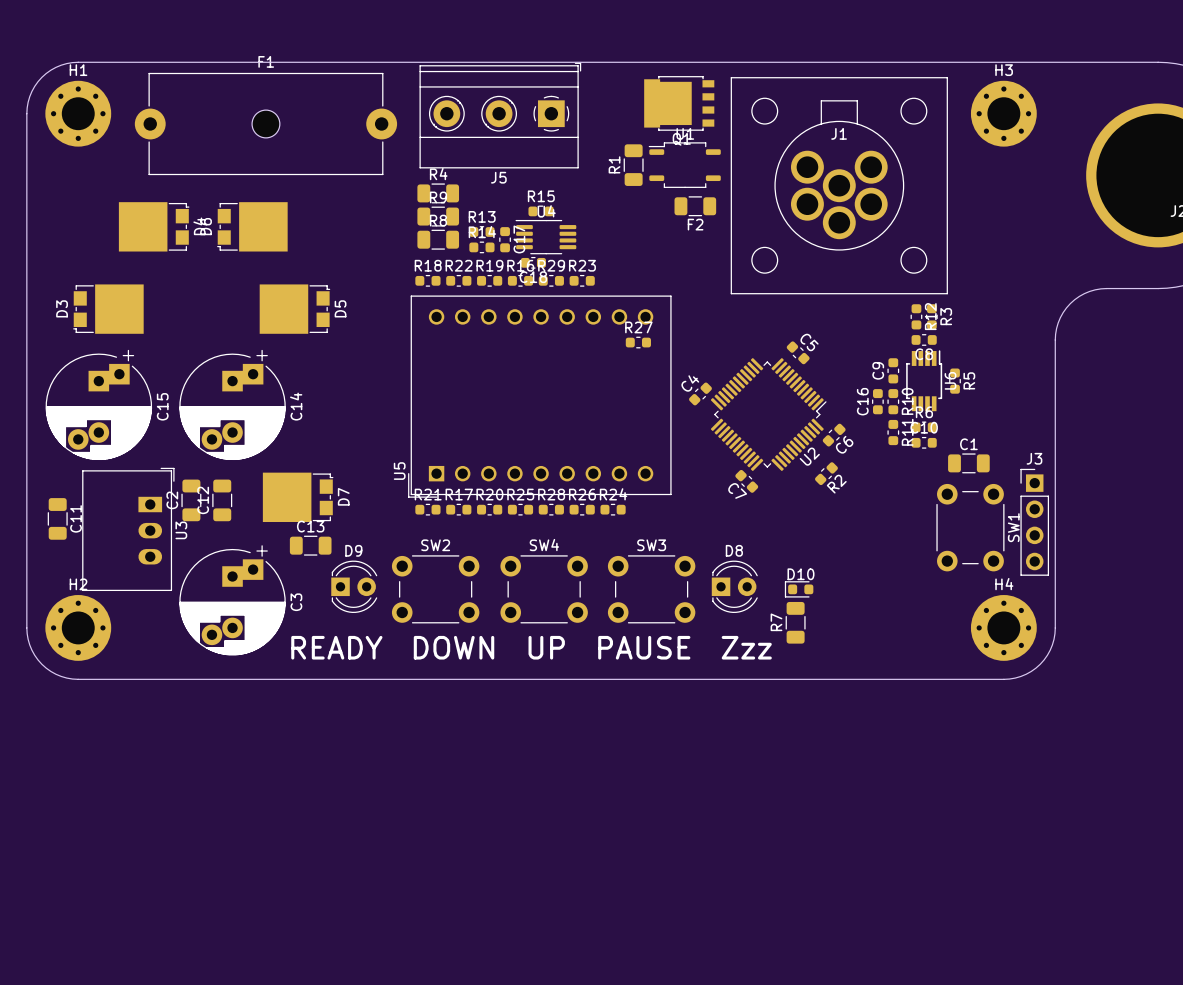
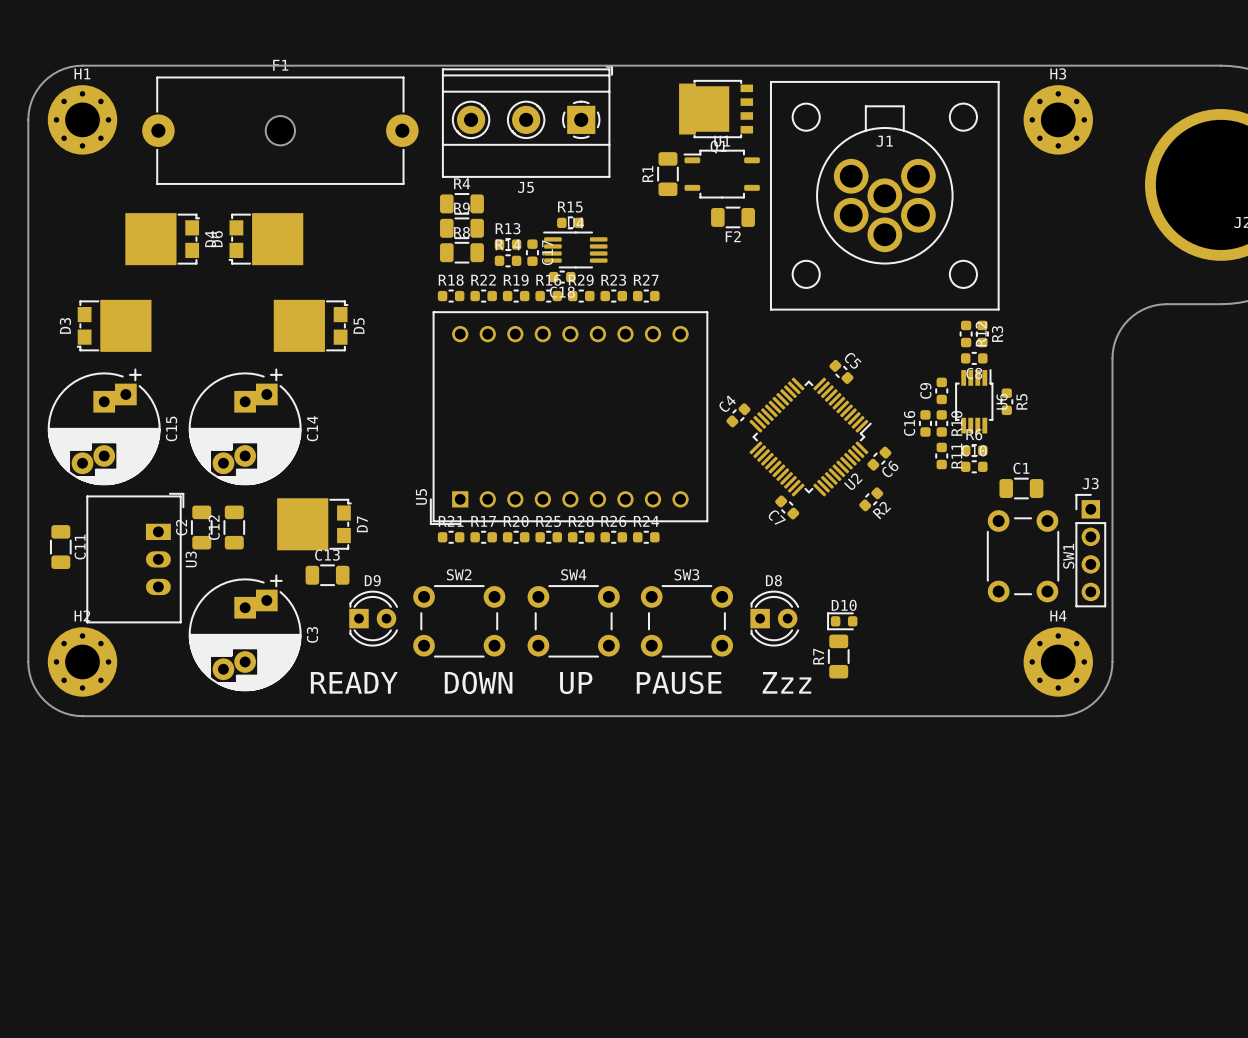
R27 position: (638, 342) -> (646, 296)

